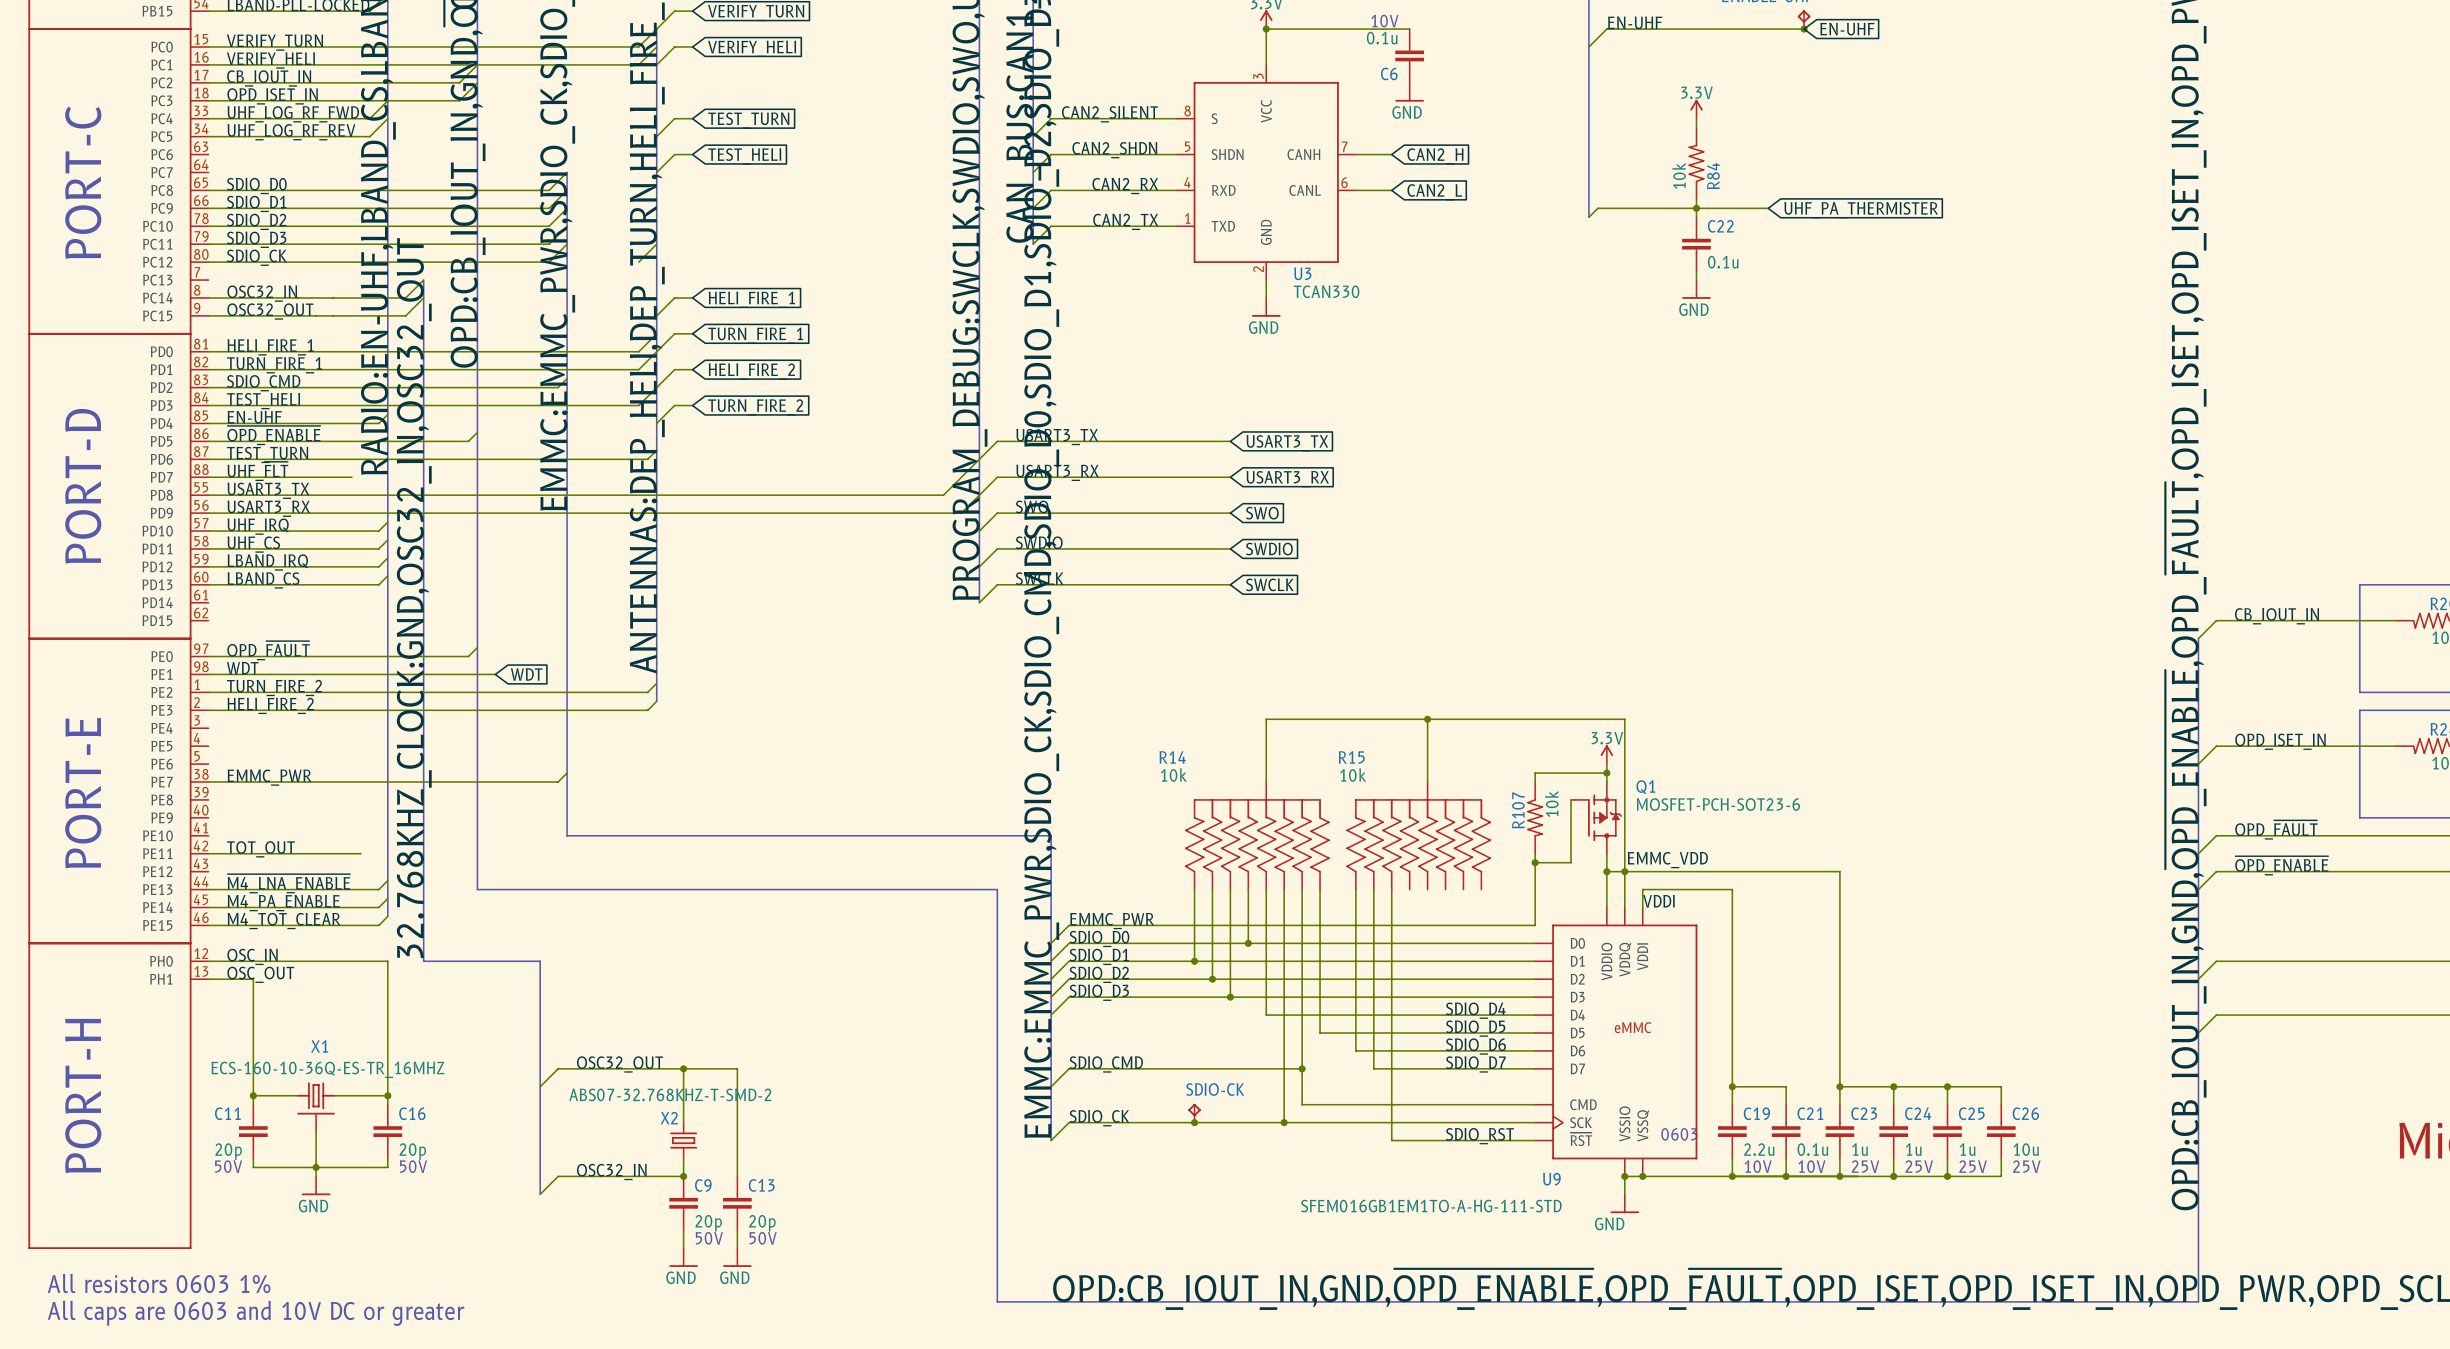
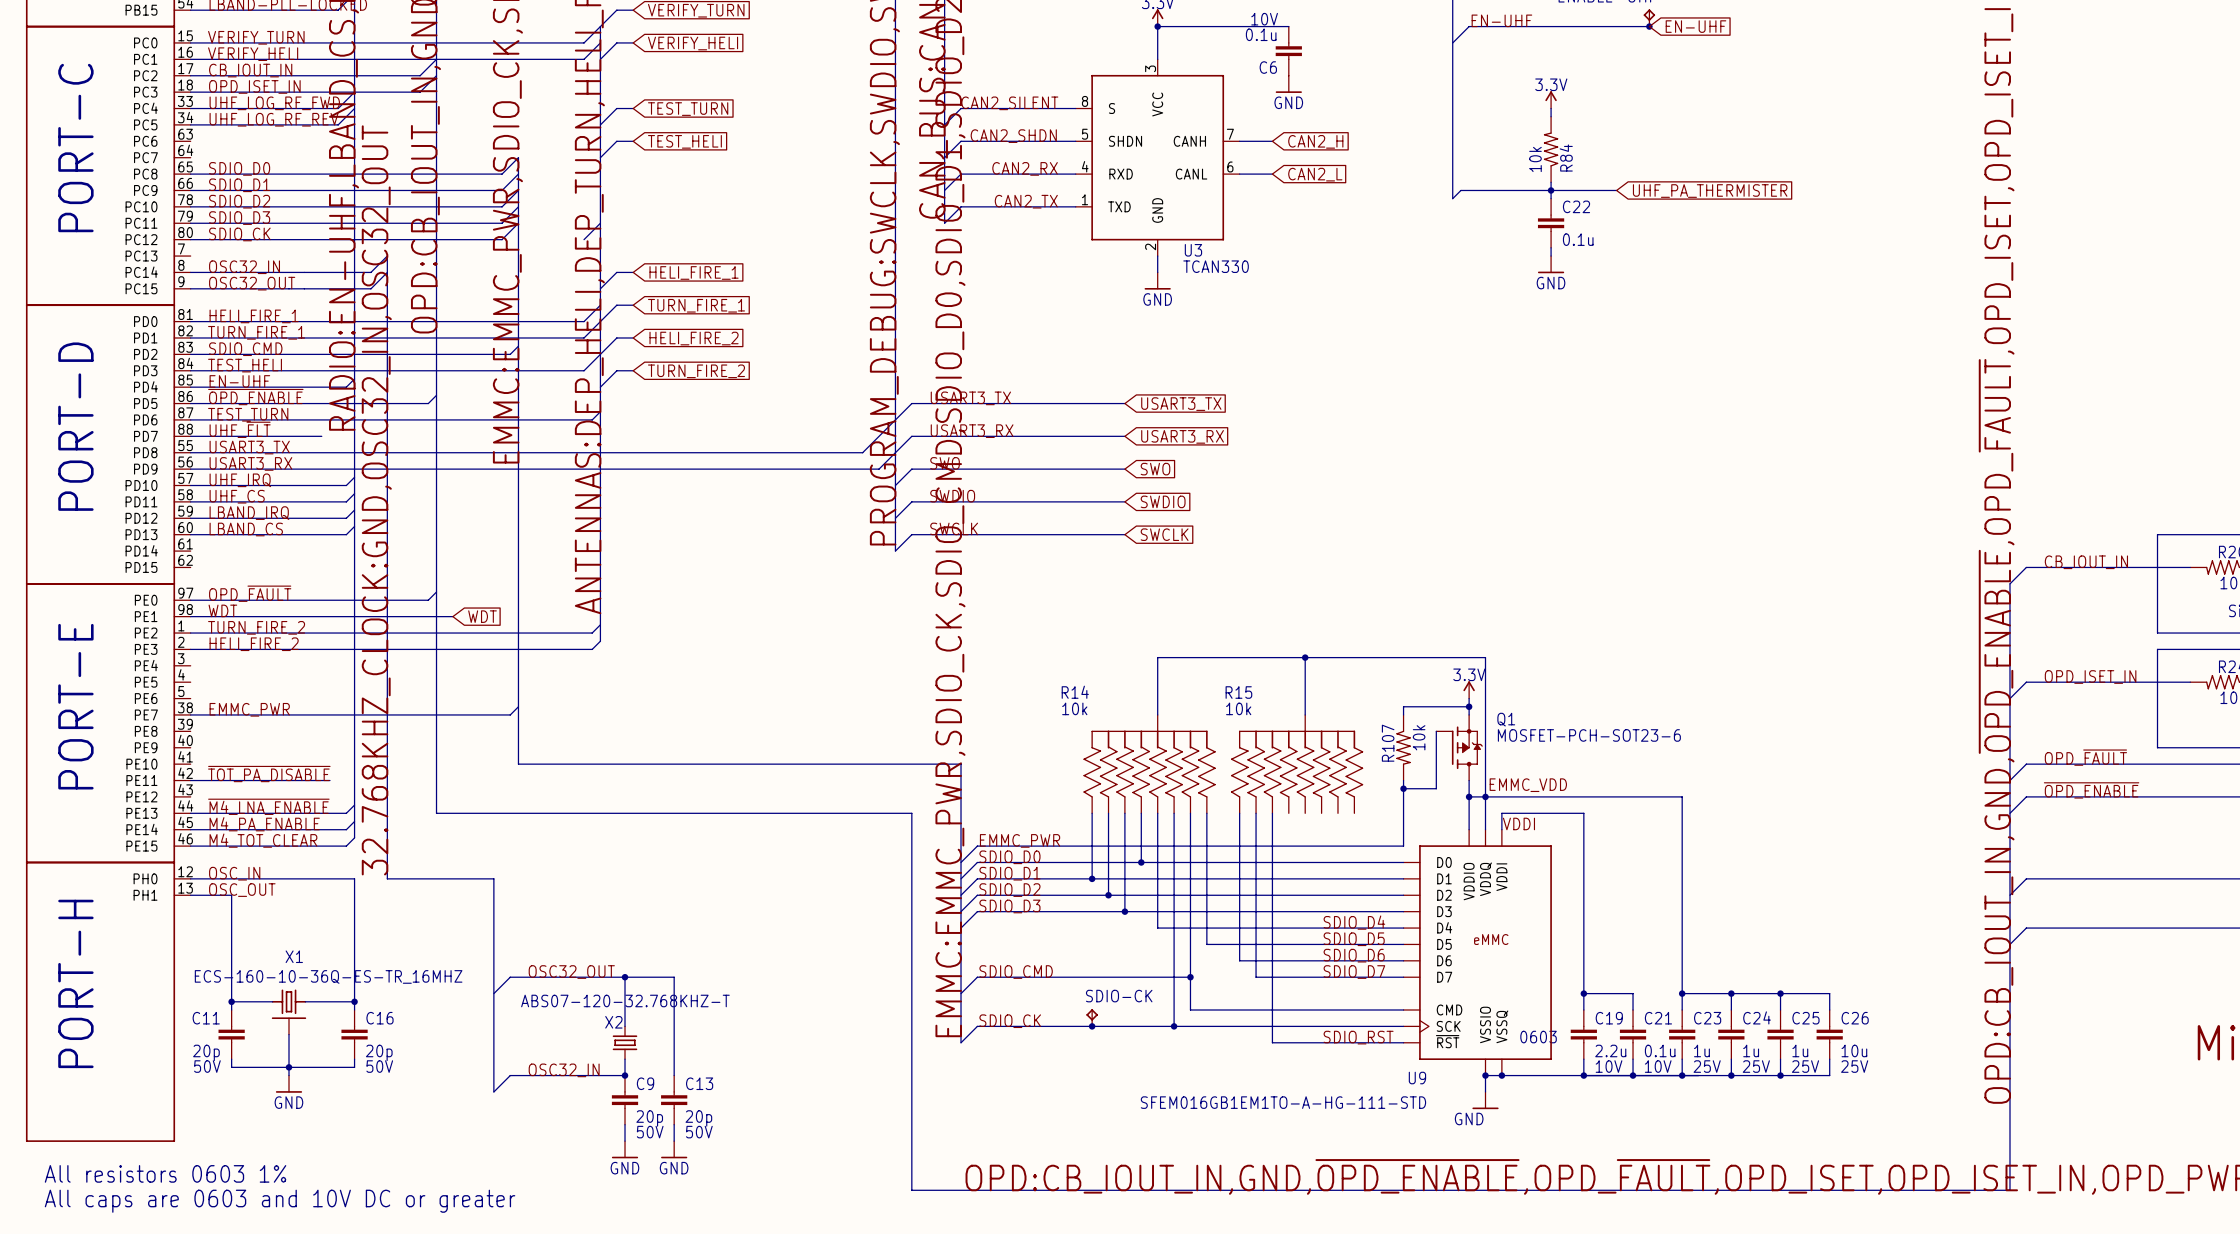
label: TOT_OUT (260, 849) -> ~{TOT_PA_DISABLE} (269, 774)
X2 value: ABS07-32.768KHZ-T-SMD-2 (670, 1094) -> ABS07-120-32.768KHZ-T (625, 1000)

